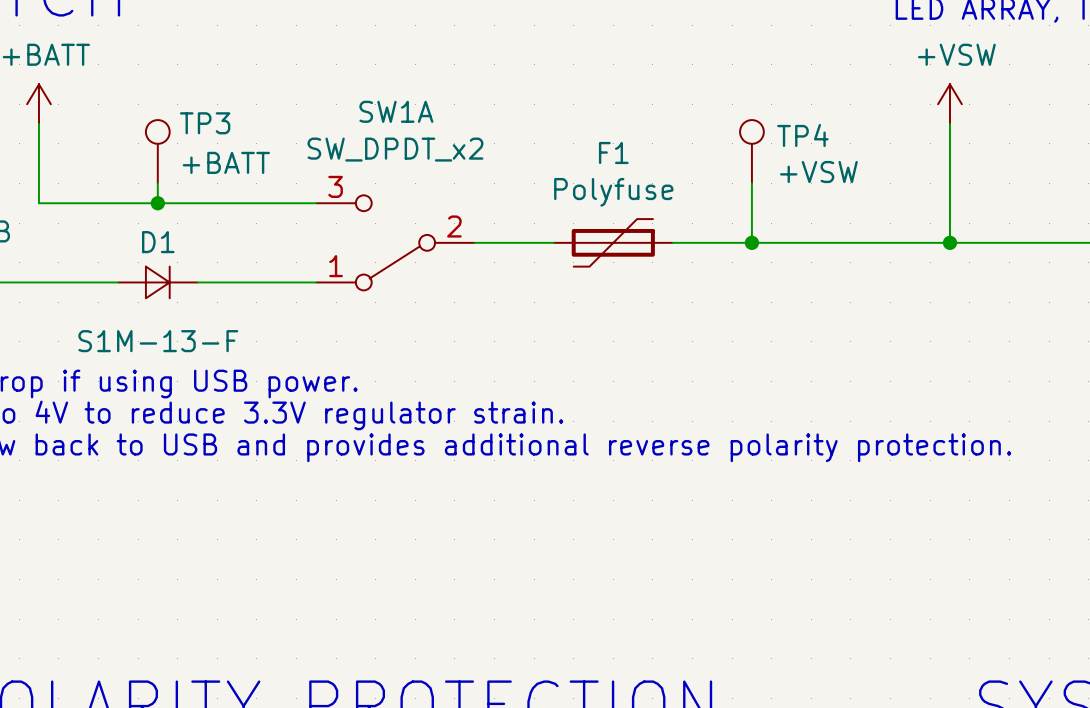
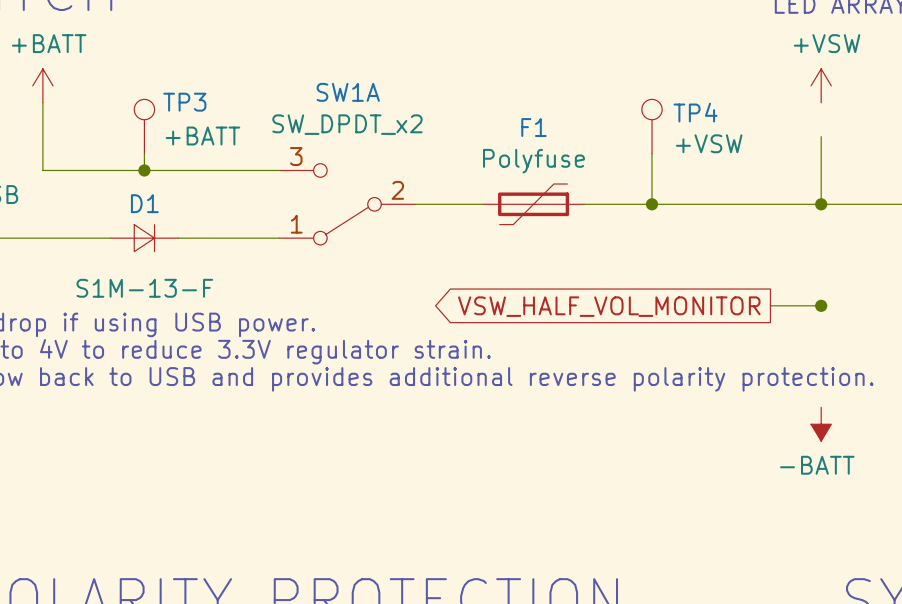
wire: (949, 124) (949, 163) -> none
wire: none -> (770, 305) (821, 305)
junction: none -> (821, 305)
global label: none -> VSW_HALF_VOL_MONITOR (609, 306)
power symbol: none -> -BATT (821, 424)

